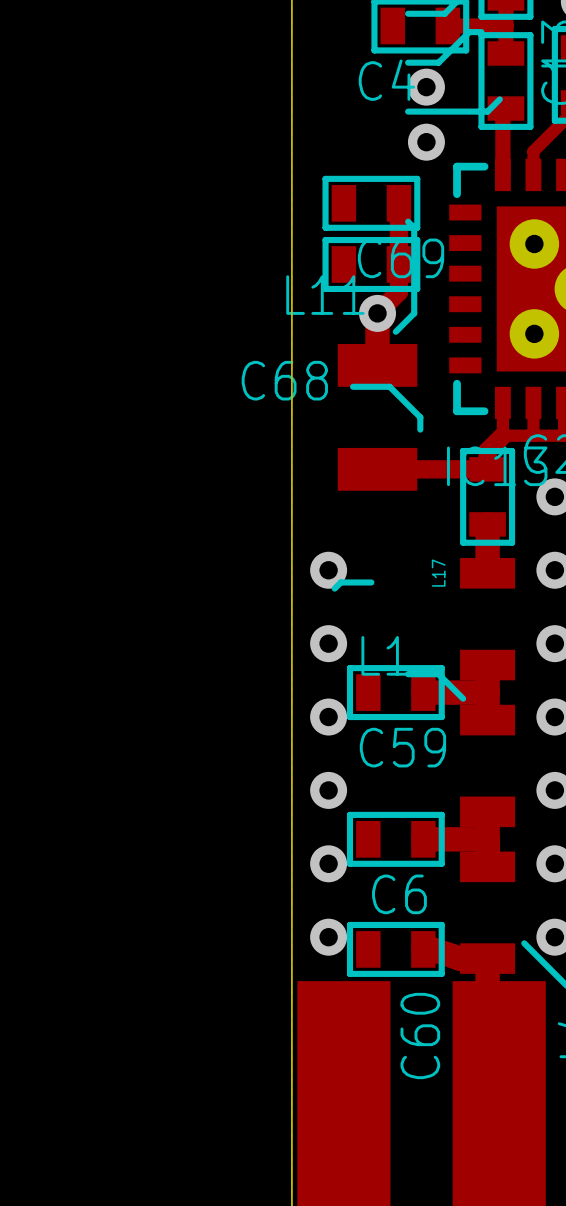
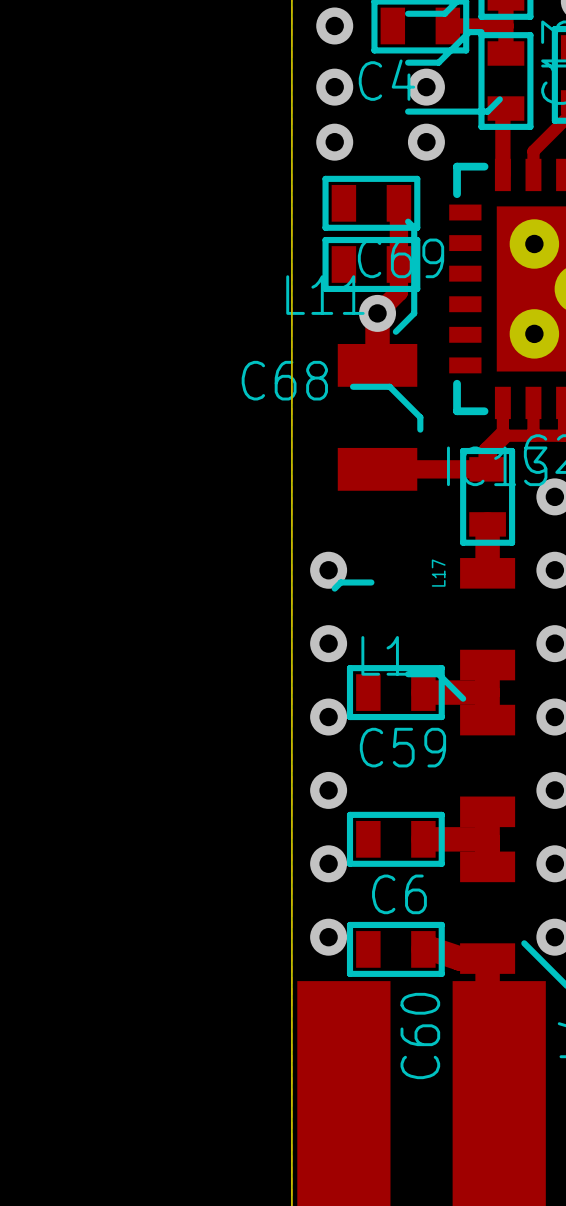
via: none -> (334, 25)
via: none -> (334, 87)
via: none -> (334, 142)

